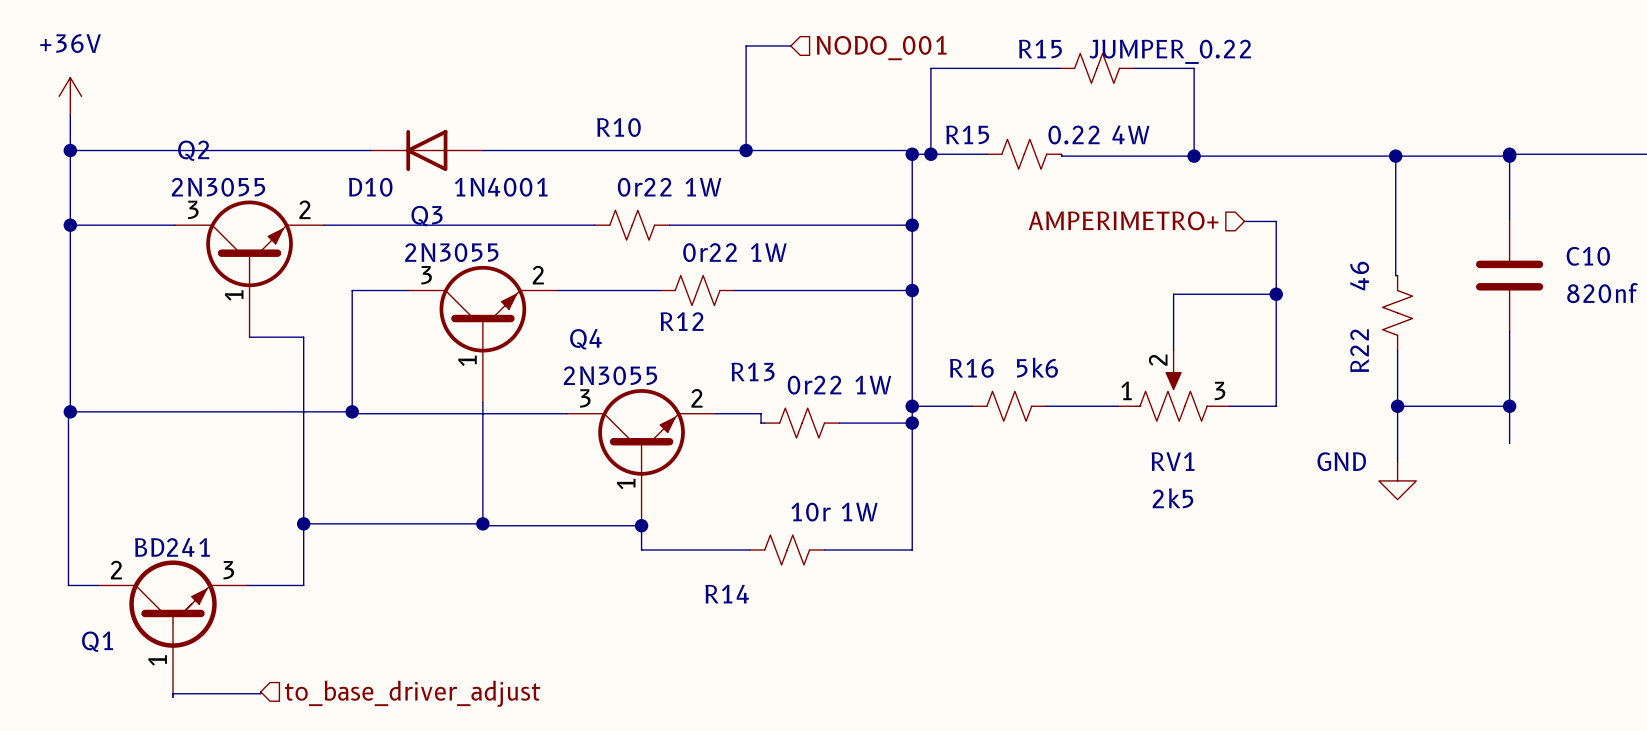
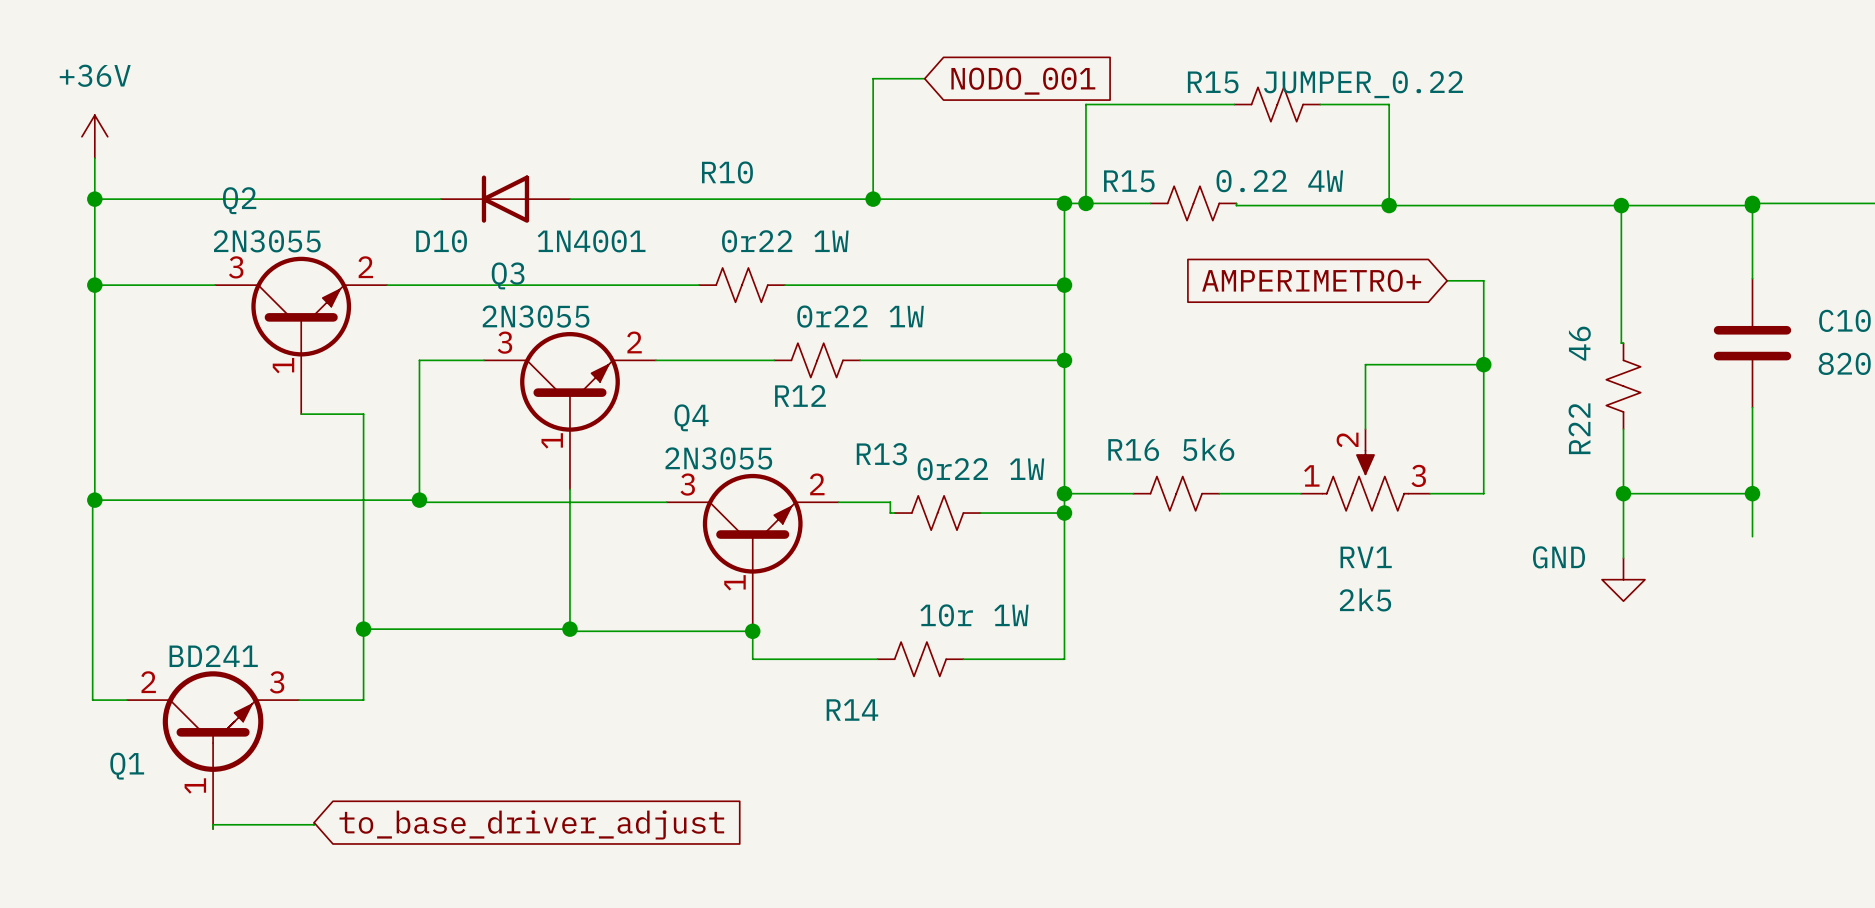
global label: none -> NODO_001 (1023, 81)
hierarchical label: NODO_001 (881, 48) -> none
hierarchical label: AMPERIMETRO+ (1123, 220) -> none
global label: none -> AMPERIMETRO+ (1311, 280)
hierarchical label: to_base_driver_adjust (412, 693) -> none
global label: none -> to_base_driver_adjust (531, 824)

